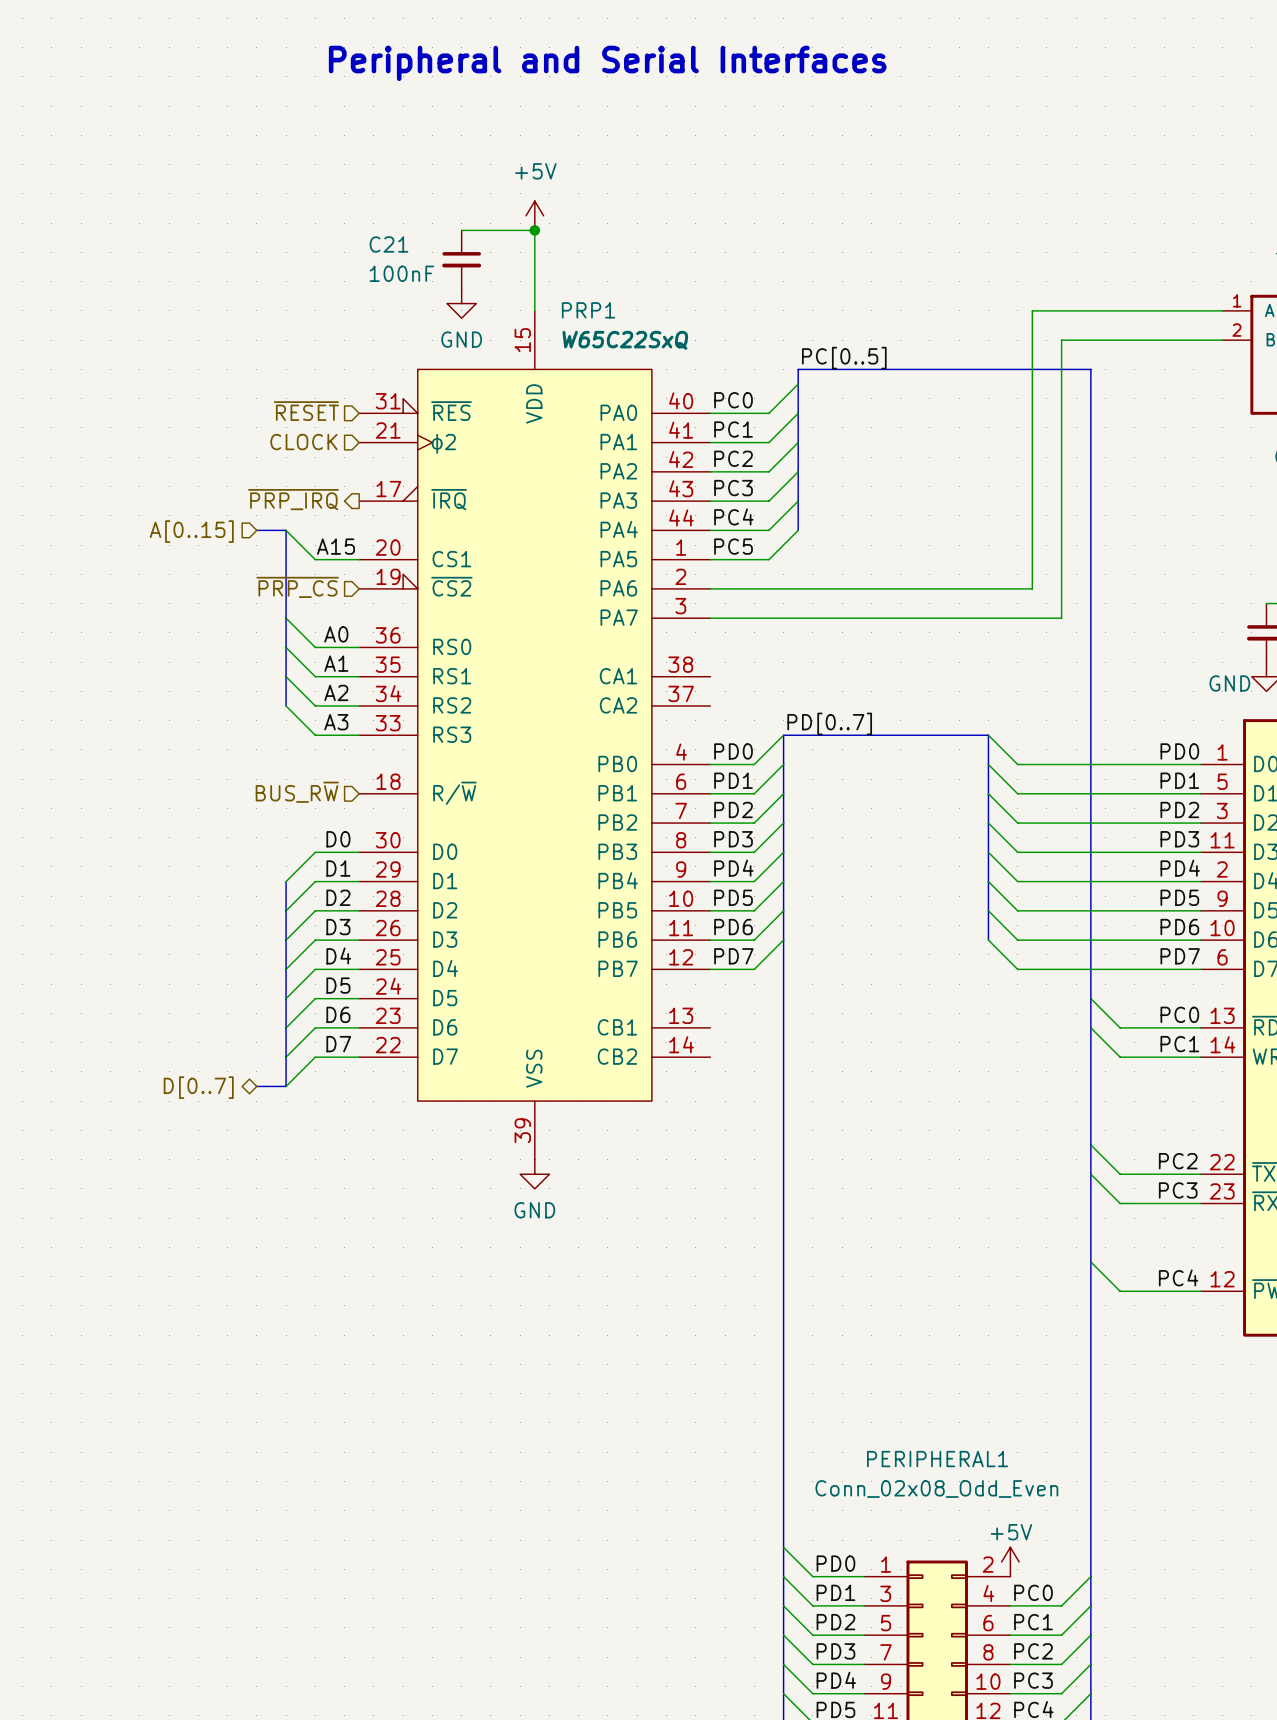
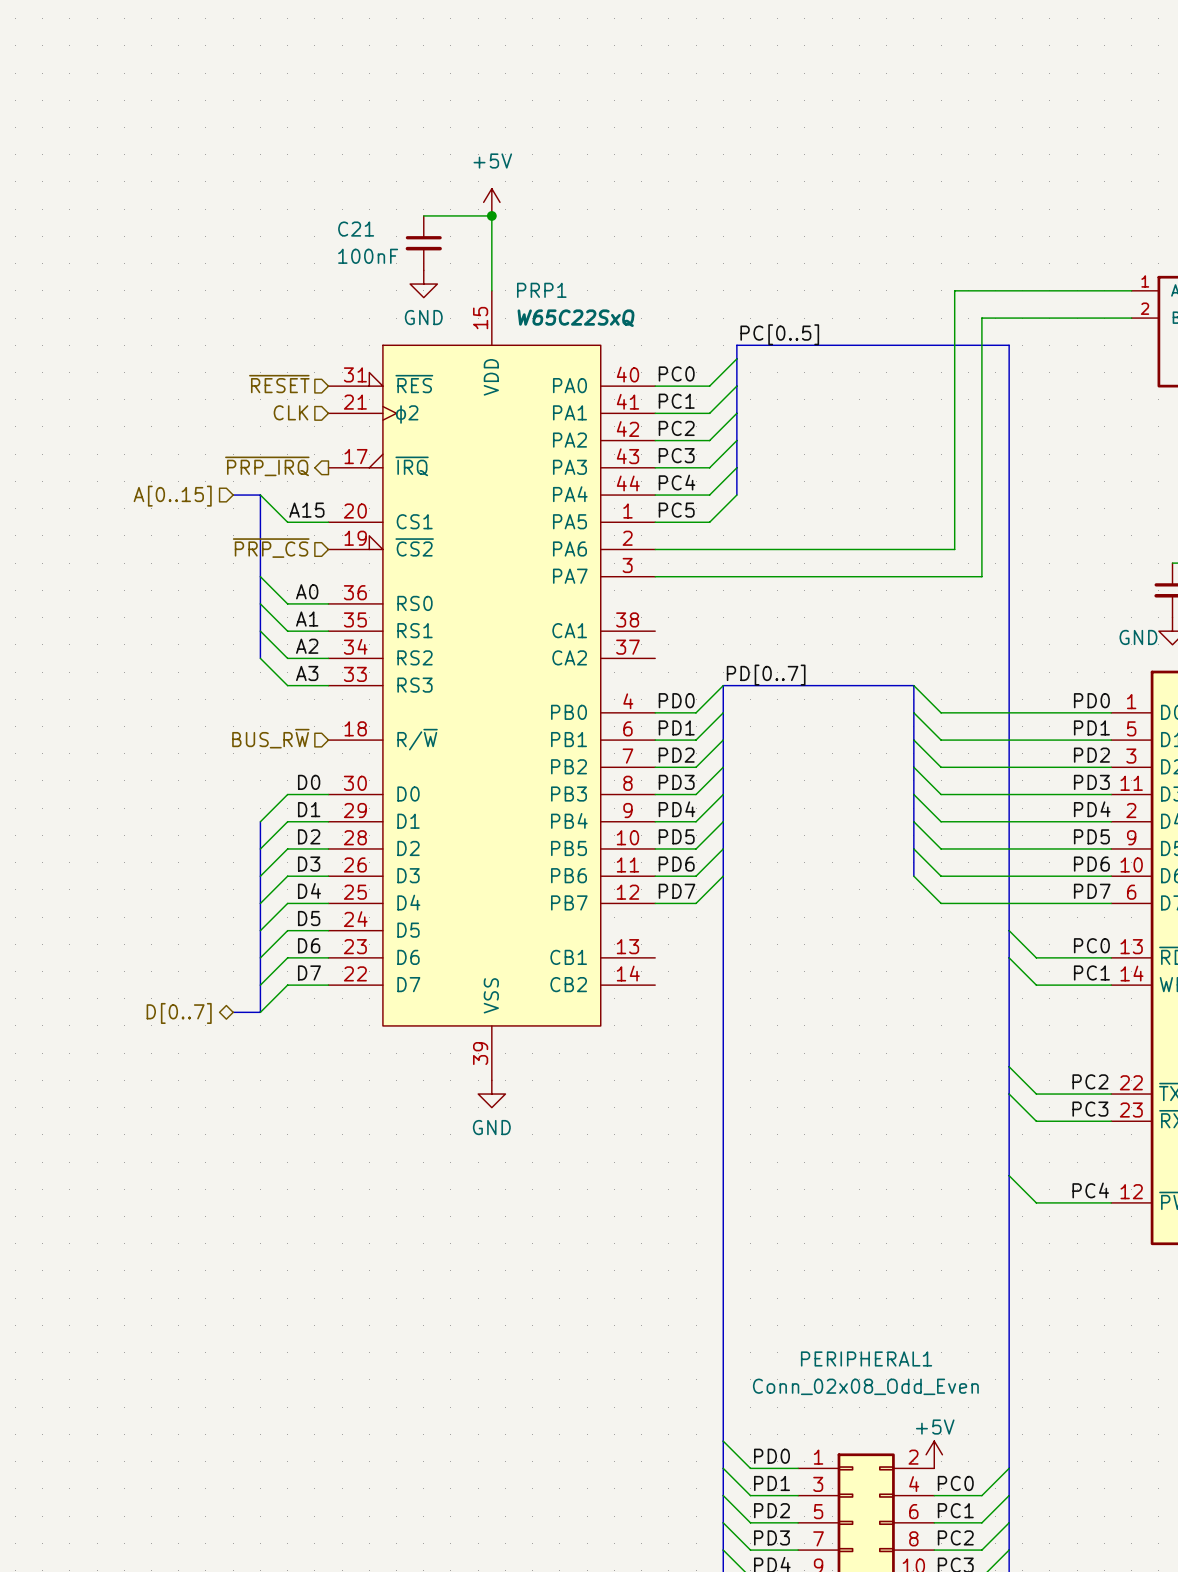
text: Peripheral and Serial Interfaces (607, 63) -> none
hierarchical label: CLOCK (303, 442) -> CLK (290, 412)

